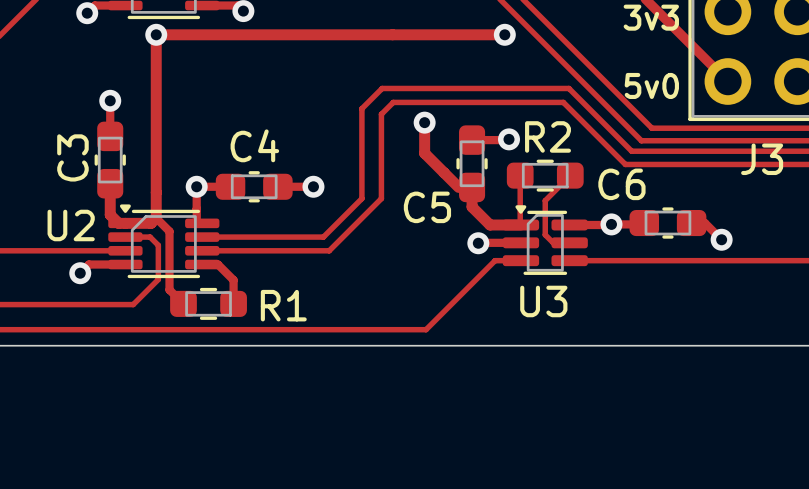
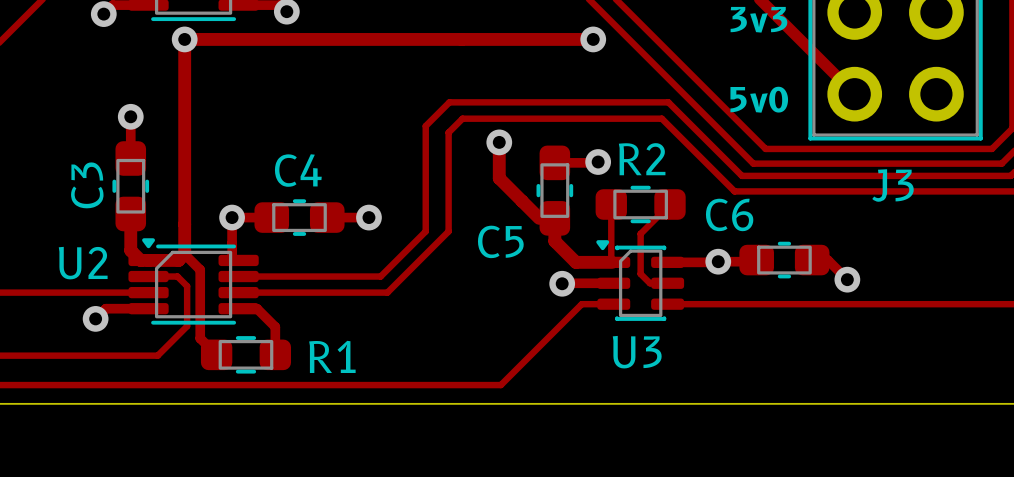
U3 footprint: [502, 205, 588, 275] -> [596, 240, 685, 321]

